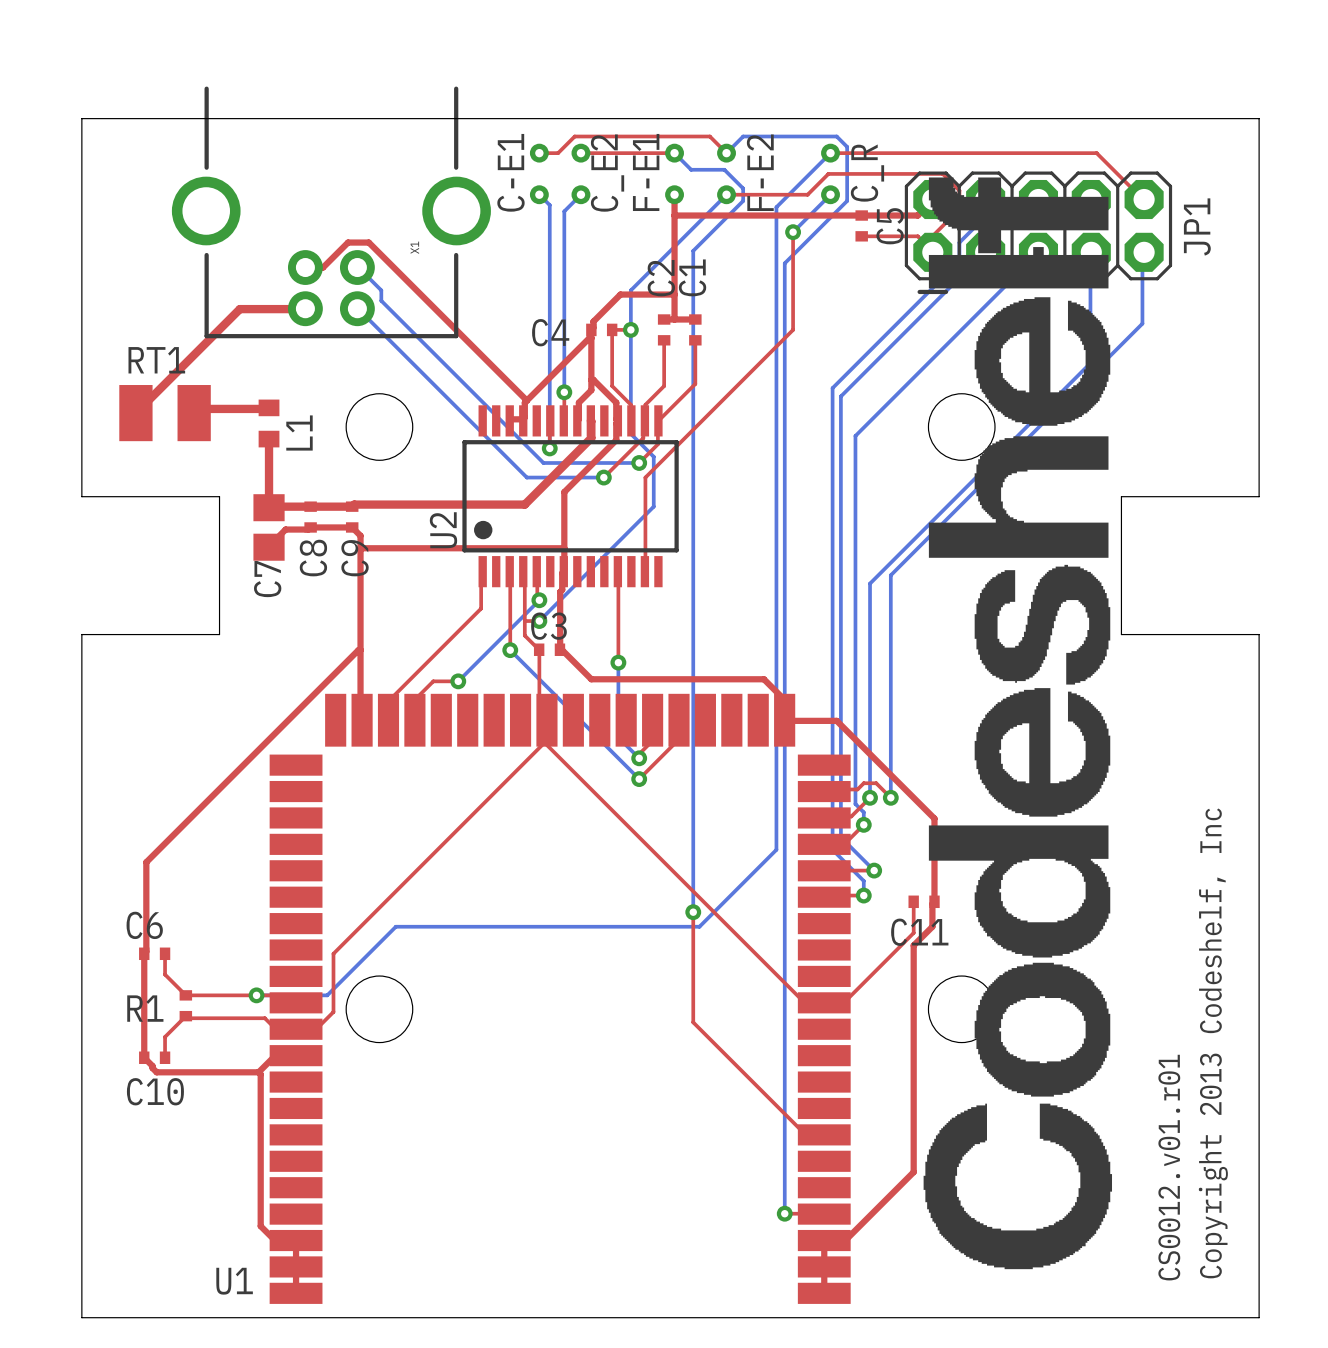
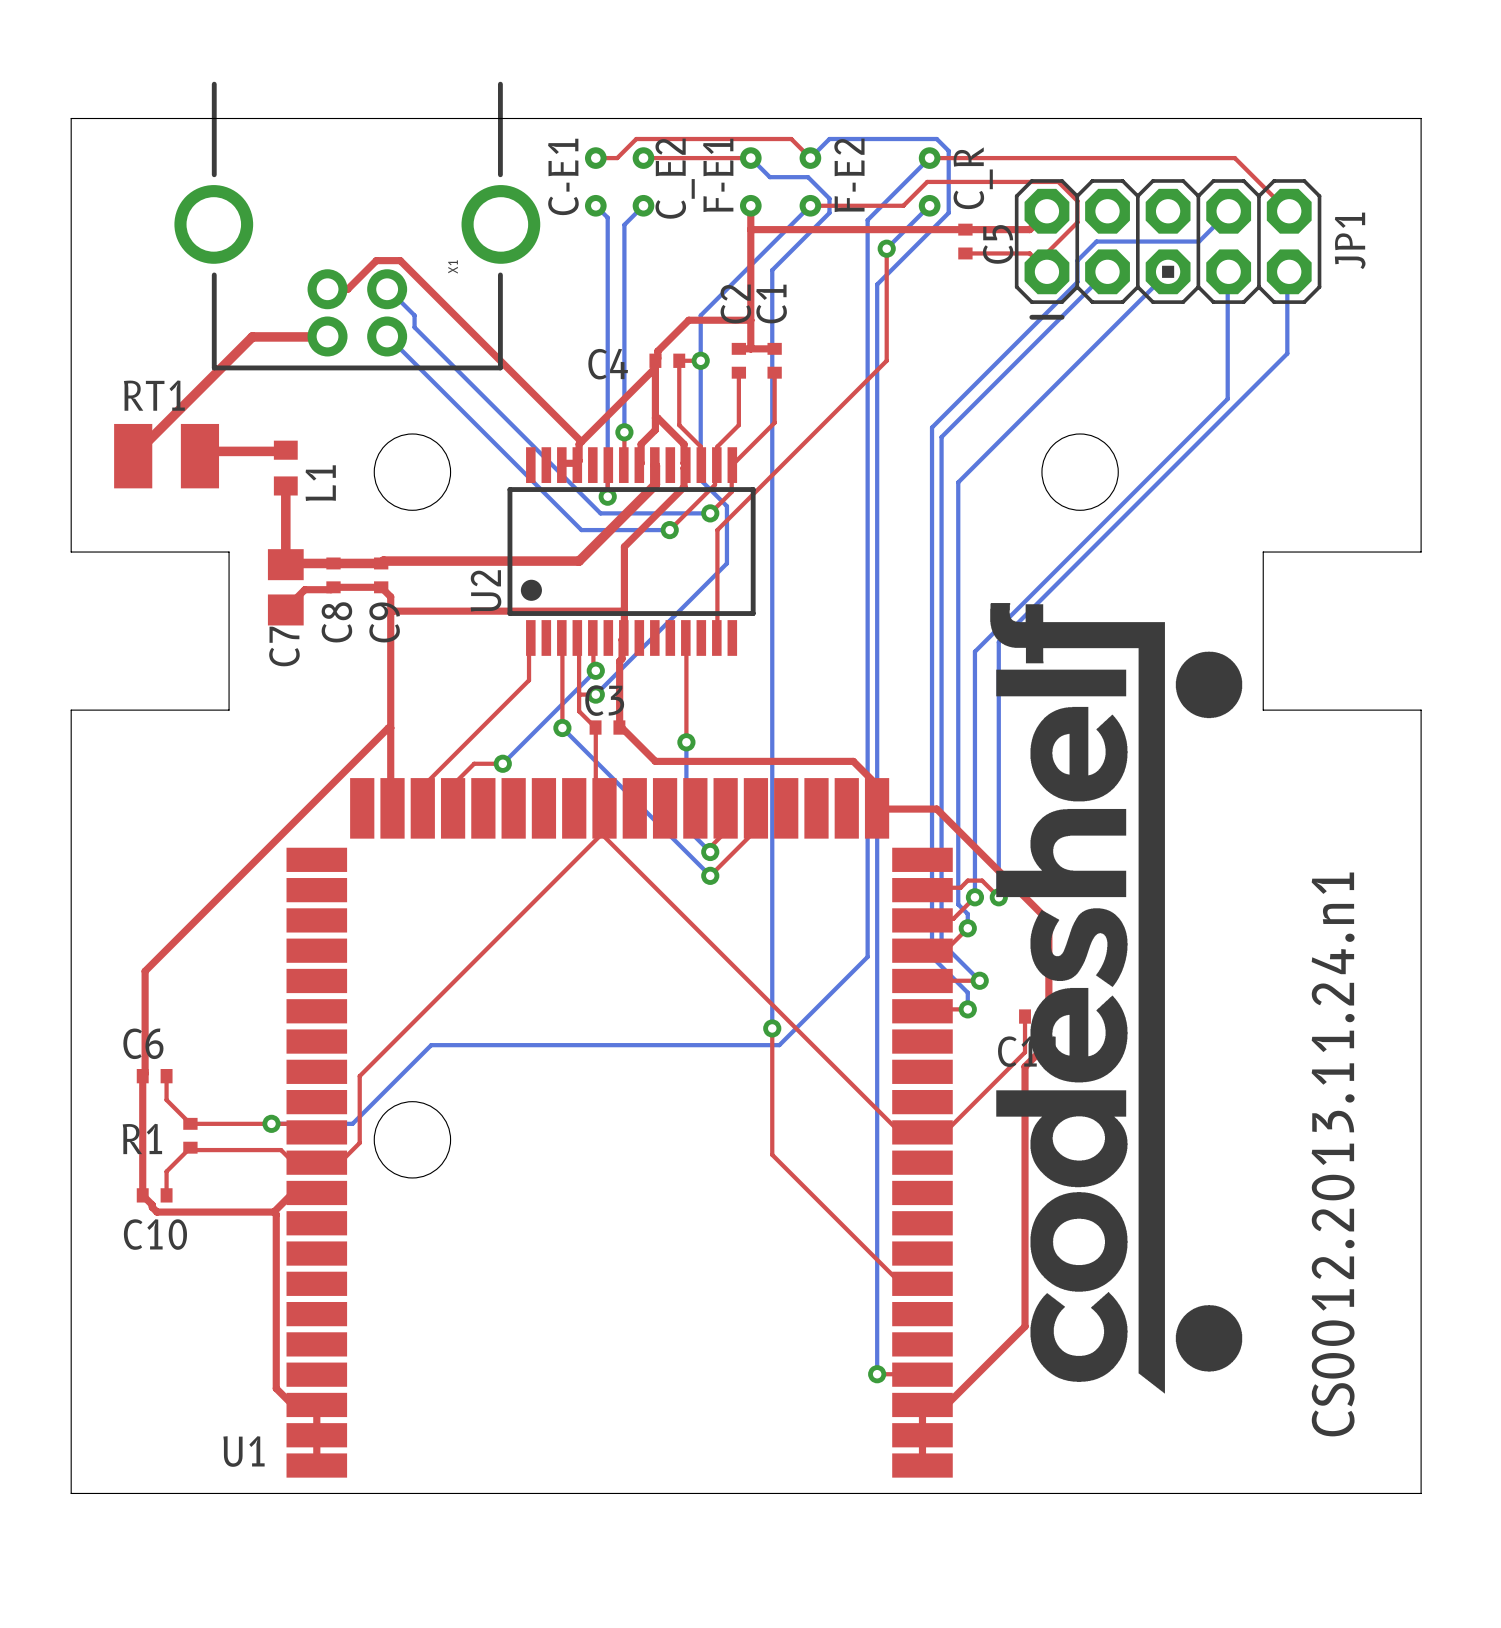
drawing: [923, 177, 1113, 1270] -> none
drawing: none -> [990, 603, 1243, 1394]
text: Copyright 2013 Codeshelf, Inc (1213, 1043) -> none
text: CS0012.v01.r01 (1169, 1167) -> CS0012.2013.11.24.n1 (1333, 1154)

